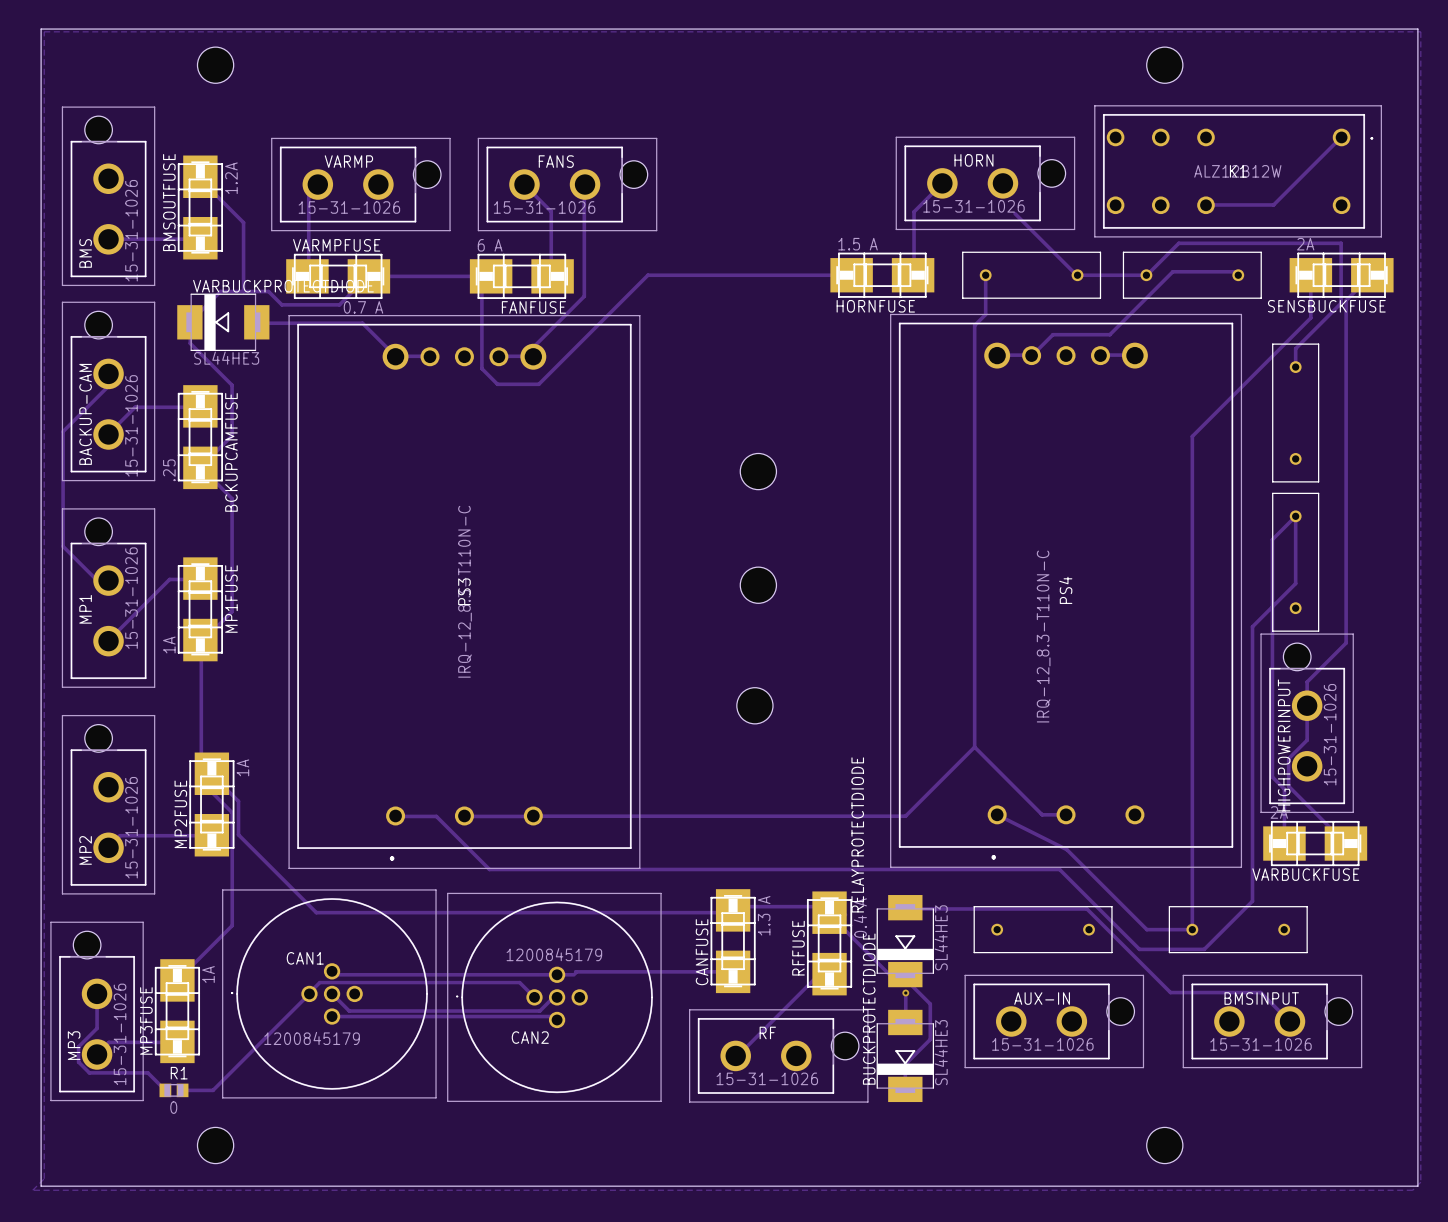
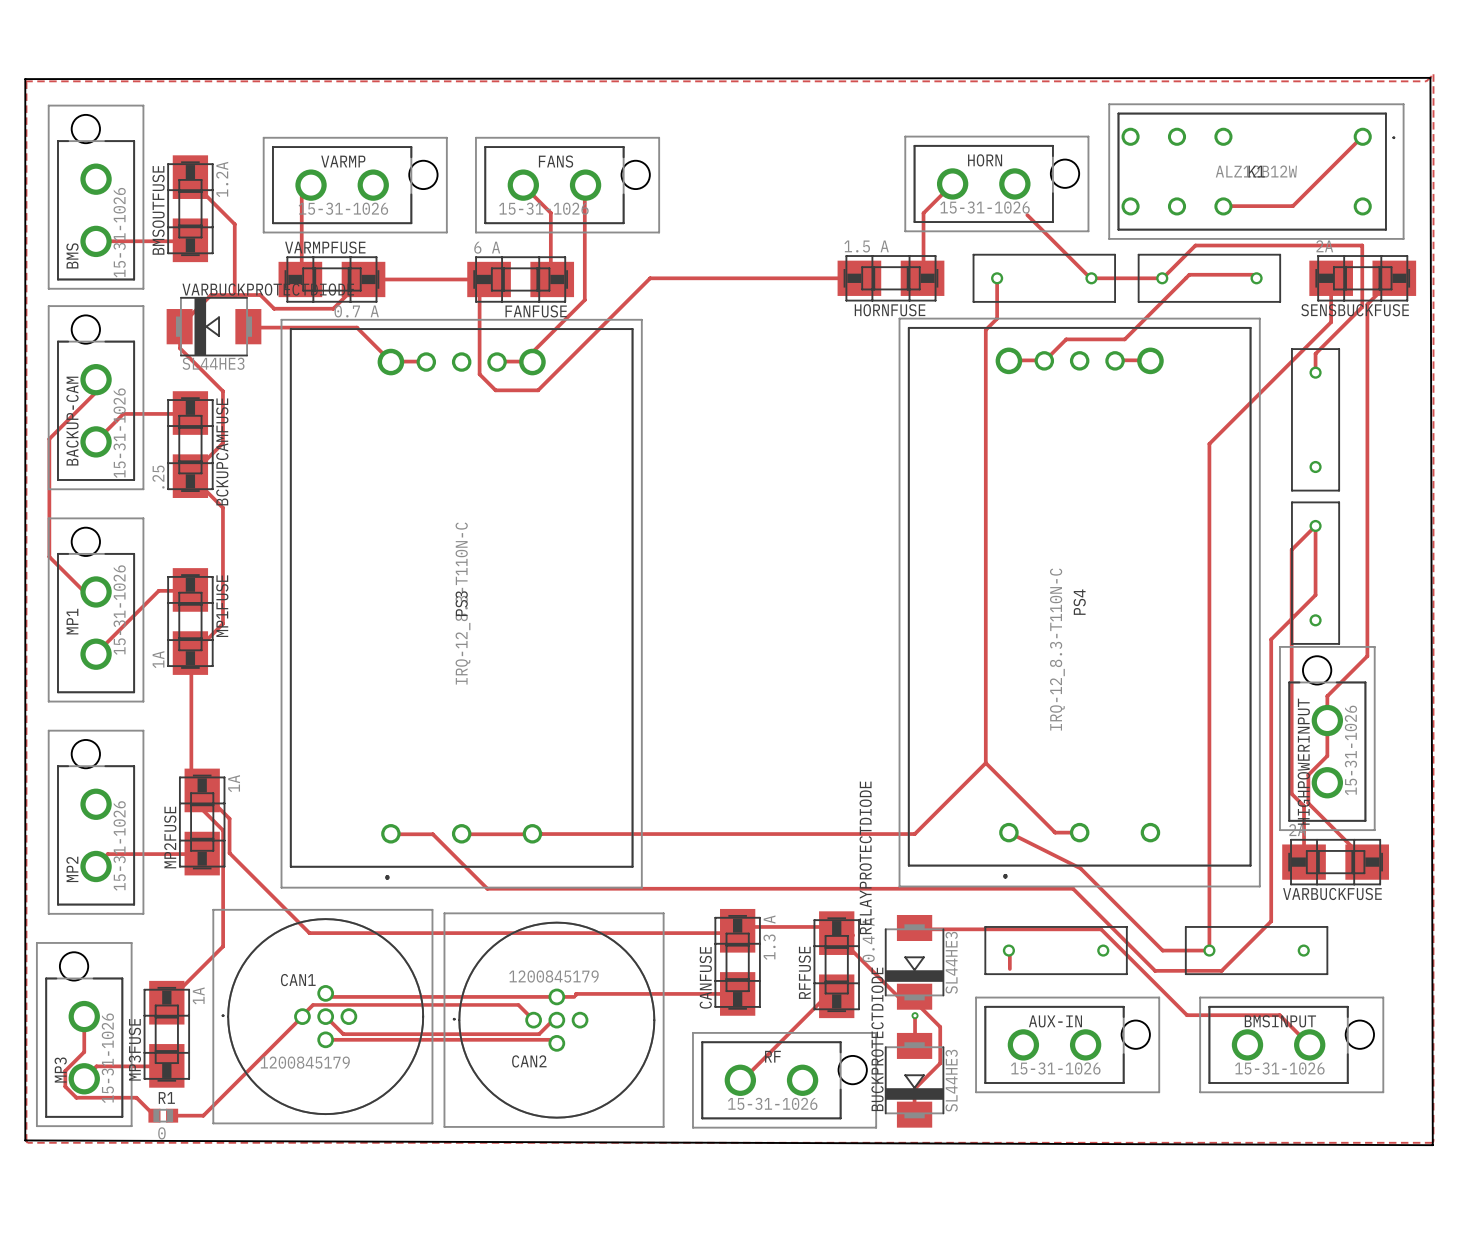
board edge: (41, 29) (1417, 29) (1417, 1186) (41, 1186) (41, 29) -> (1430, 77) (25, 79) (25, 1140) (1432, 1145) (1430, 77)
zone outline: (44, 31) (1420, 31) (1420, 1182) (1412, 1190) (32, 1190) (44, 1178) (44, 31) -> (1433, 74) (1426, 81) (25, 81) (26, 1141) (1432, 1142) (1433, 74)
hole: (215, 65) -> none
hole: (1164, 65) -> none
hole: (758, 471) -> none
hole: (758, 585) -> none
hole: (754, 705) -> none
track: none -> (1008, 950) (1009, 968)
hole: (215, 1145) -> none
hole: (1164, 1145) -> none

